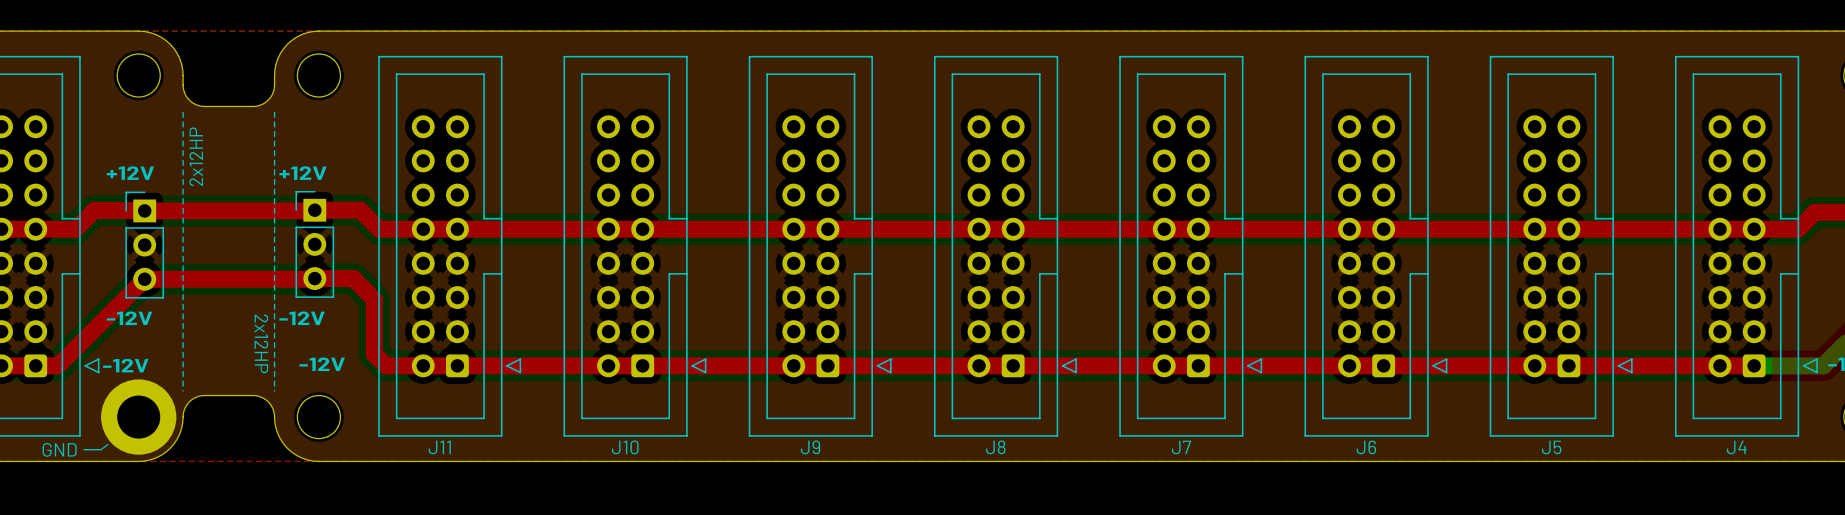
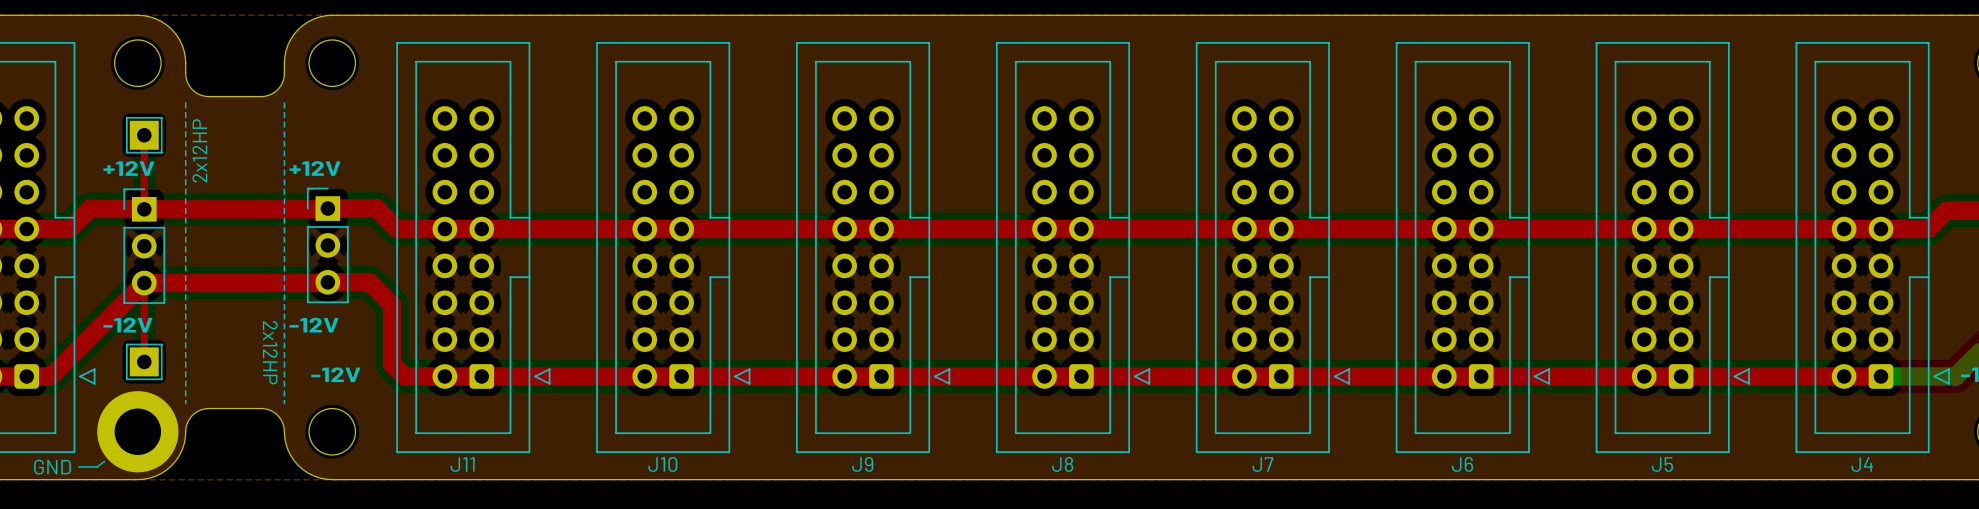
top track: none -> (144, 135) (144, 209)
part: none -> (144, 135)
top track: none -> (144, 283) (144, 361)
part: none -> (144, 361)
text: -12V (125, 365) -> none

